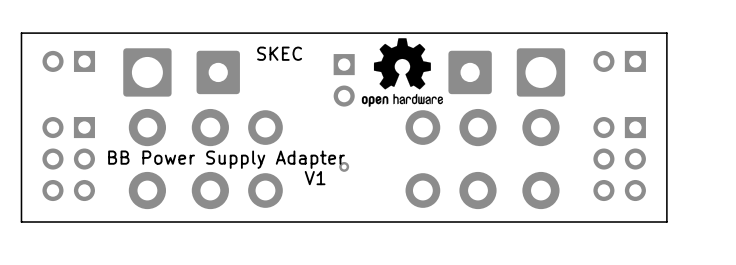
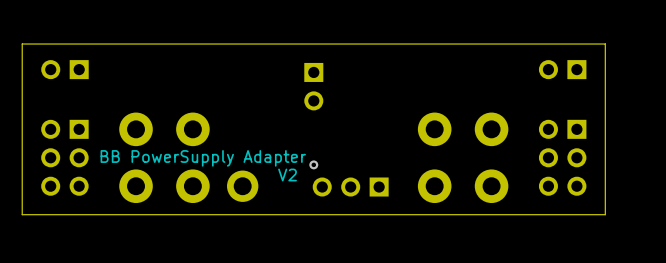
drawing: [361, 38, 443, 107] -> none
text: SKEC (279, 53) -> none
part: (147, 72) -> none
part: (218, 72) -> none
part: (470, 72) -> none
part: (540, 72) -> none
part: (265, 127) -> none
part: (422, 127) -> none
text: BB Power Supply Adapter (226, 159) -> BB PowerSupply Adapter (203, 158)
text: V1 (315, 178) -> V2 (287, 174)
part: (422, 190) -> none
part: none -> (350, 187)

